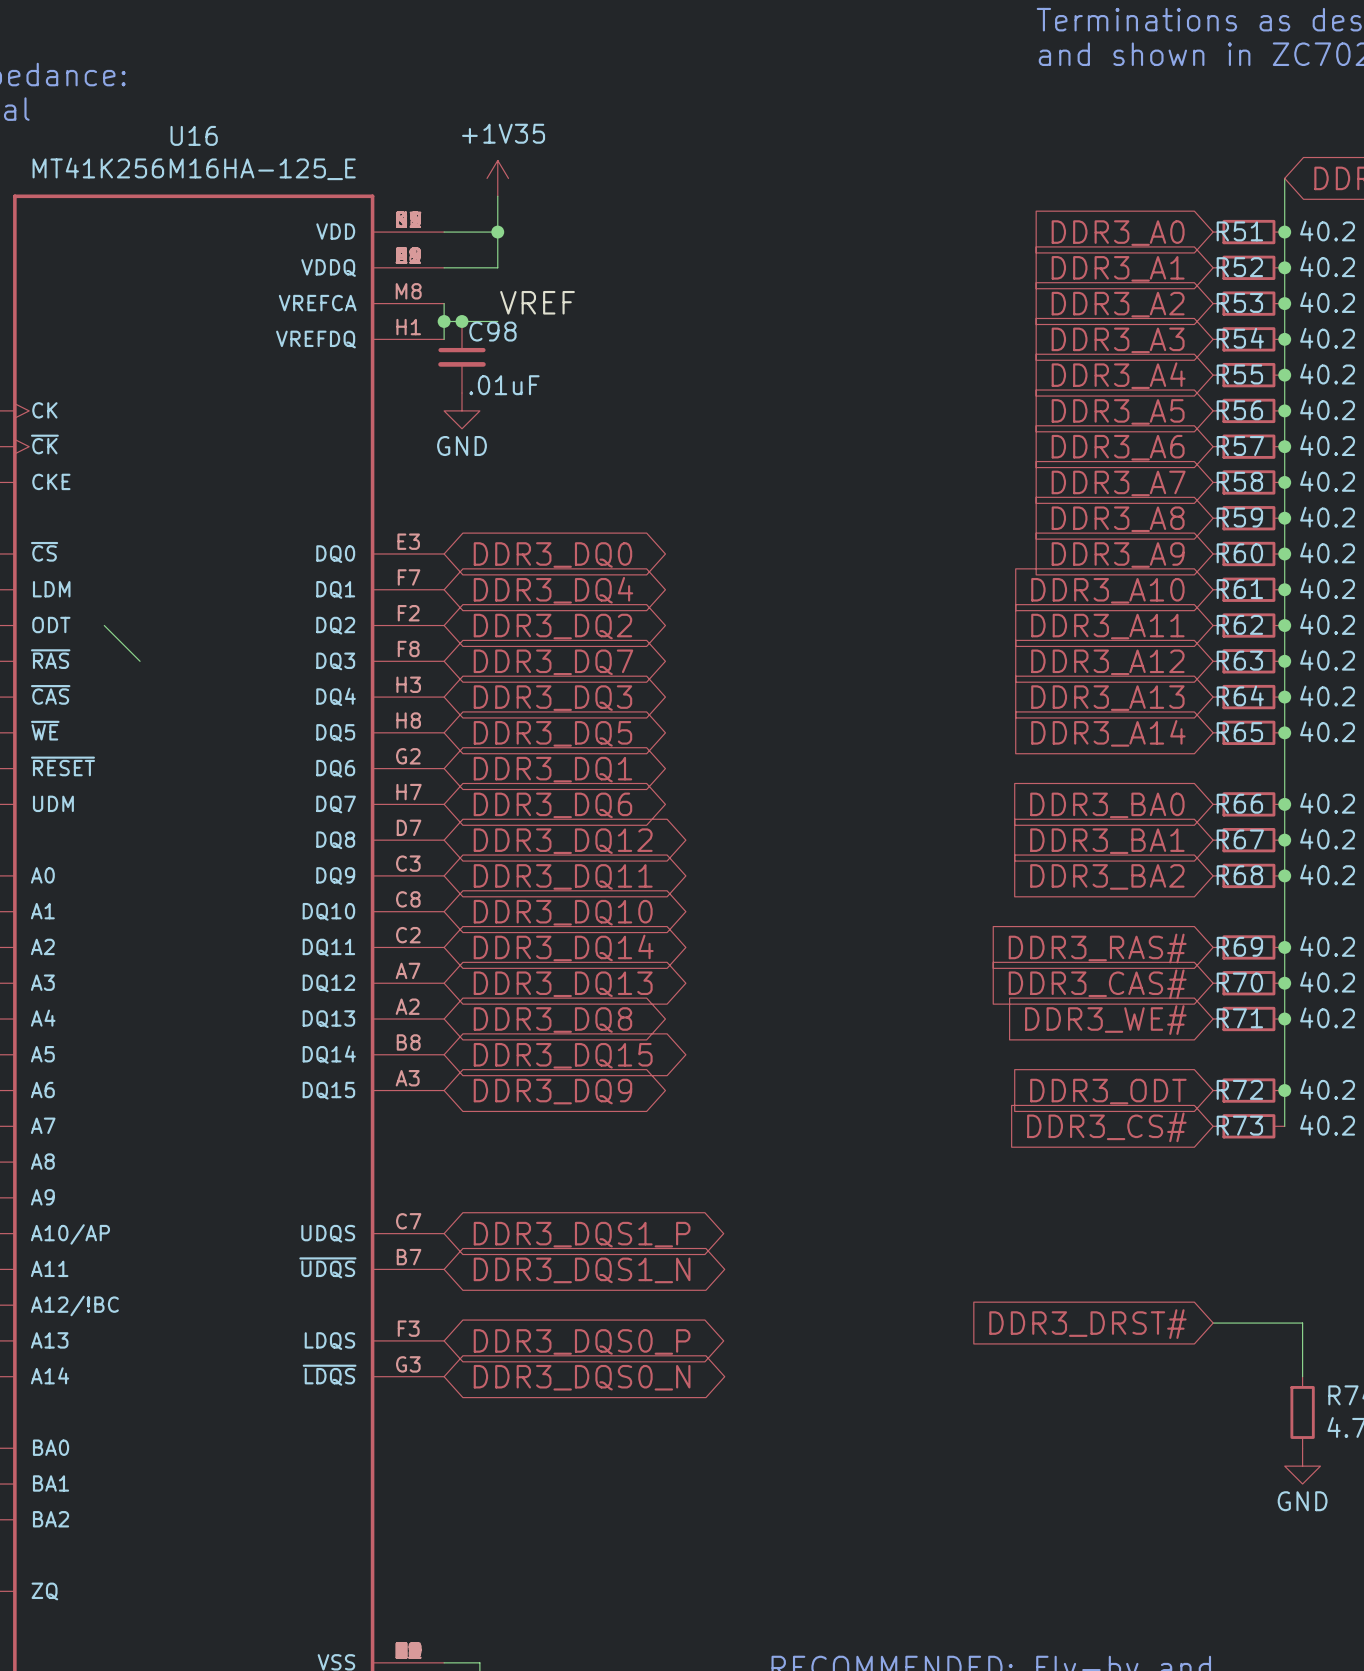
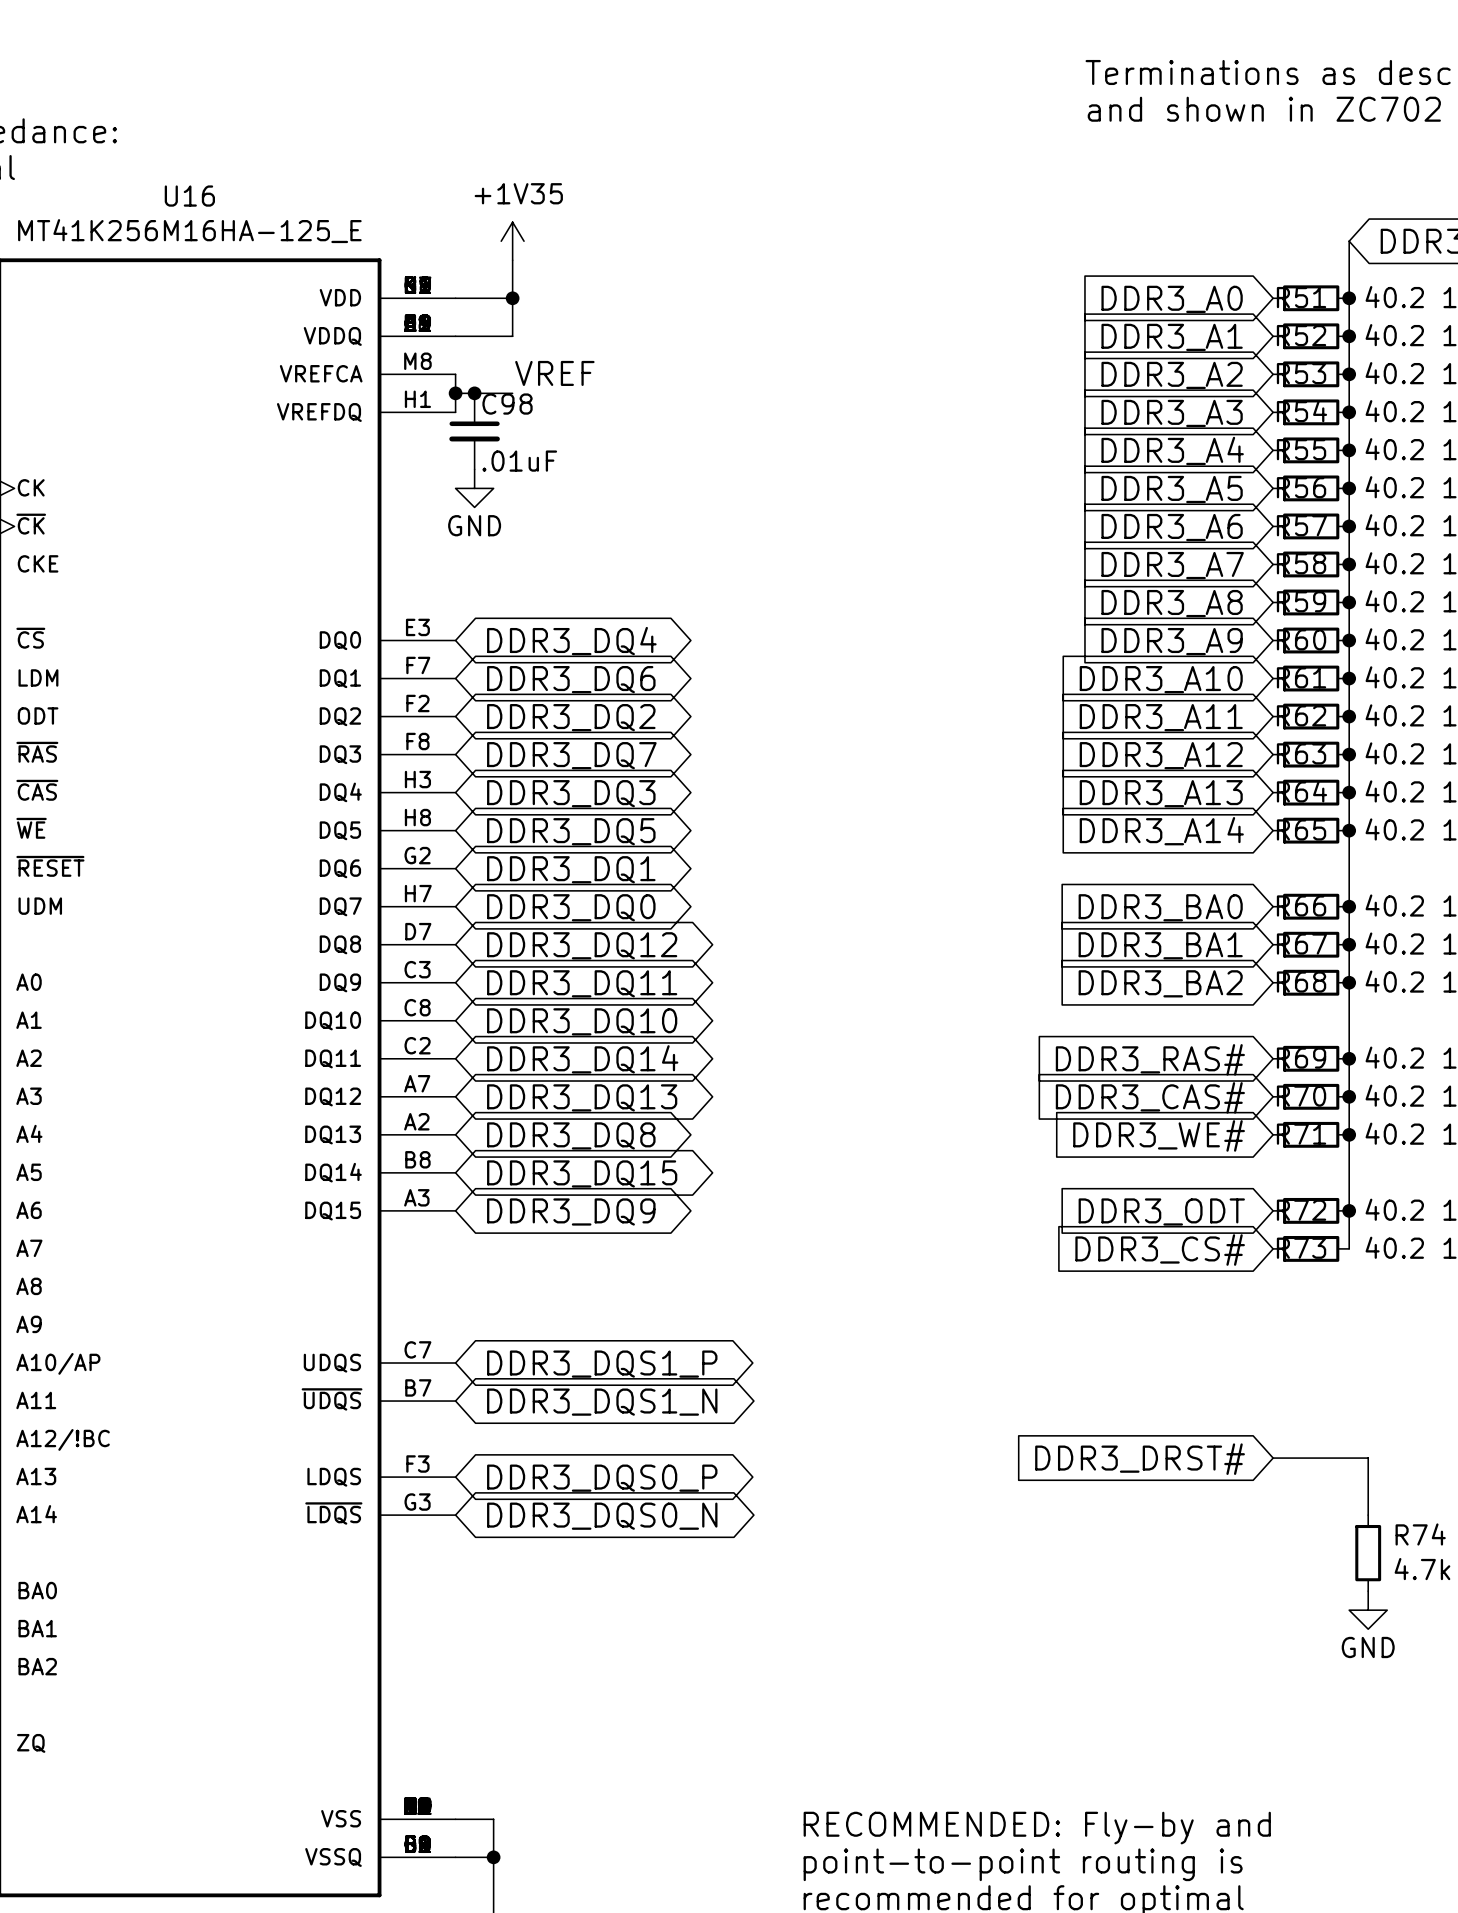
global label: DDR3_DQ0 (552, 555) -> DDR3_DQ4 (571, 641)
global label: DDR3_DQ4 (553, 590) -> DDR3_DQ6 (571, 679)
wire: (104, 625) (140, 661) -> none
global label: DDR3_DQ6 (552, 805) -> DDR3_DQ0 (571, 907)

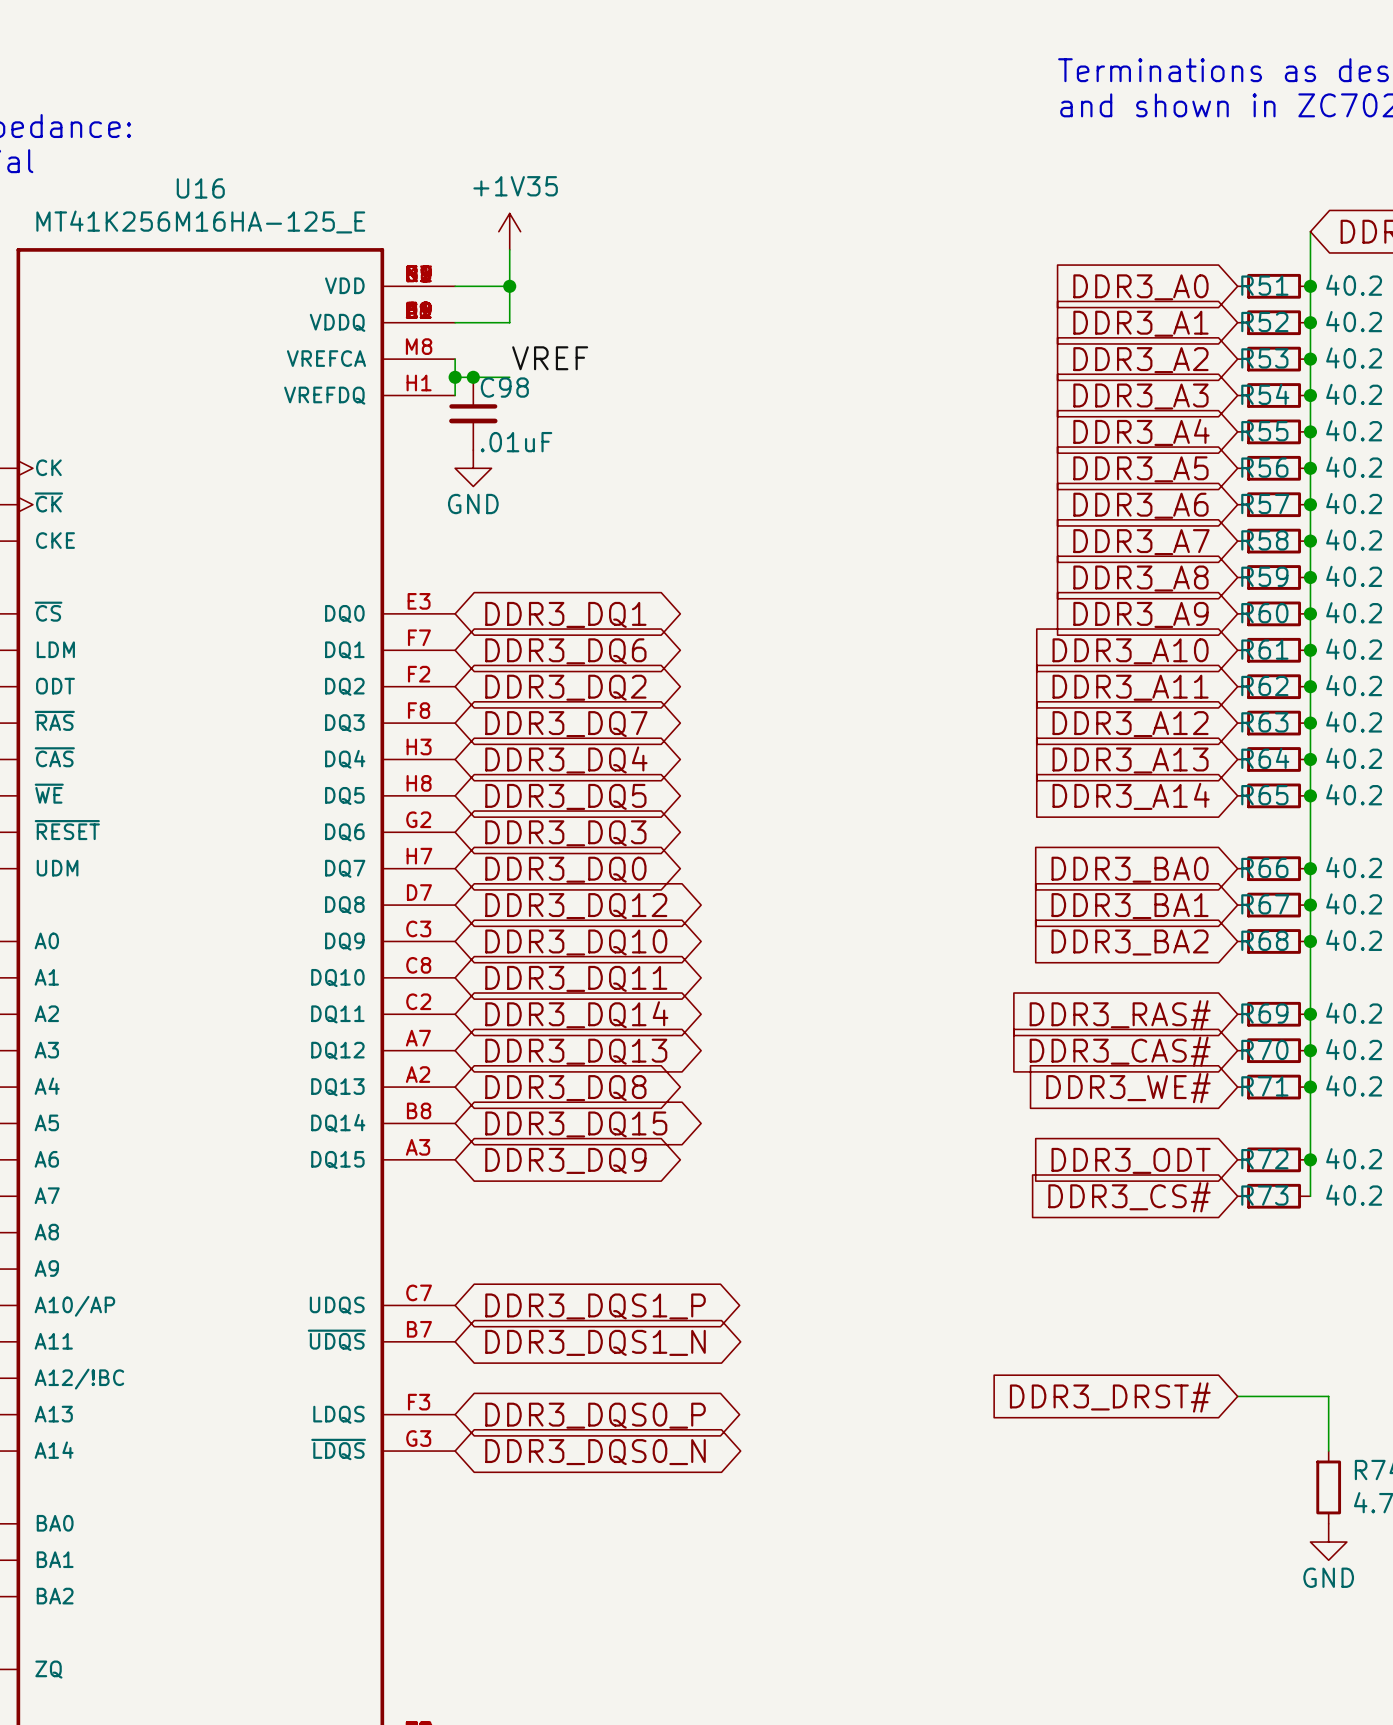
global label: DDR3_DQ4 (571, 641) -> DDR3_DQ1 (565, 614)
global label: DDR3_DQ3 (571, 793) -> DDR3_DQ4 (566, 760)
global label: DDR3_DQ1 (571, 869) -> DDR3_DQ3 (565, 833)
global label: DDR3_DQ11 (582, 983) -> DDR3_DQ10 (576, 942)
global label: DDR3_DQ10 (582, 1021) -> DDR3_DQ11 (576, 978)

